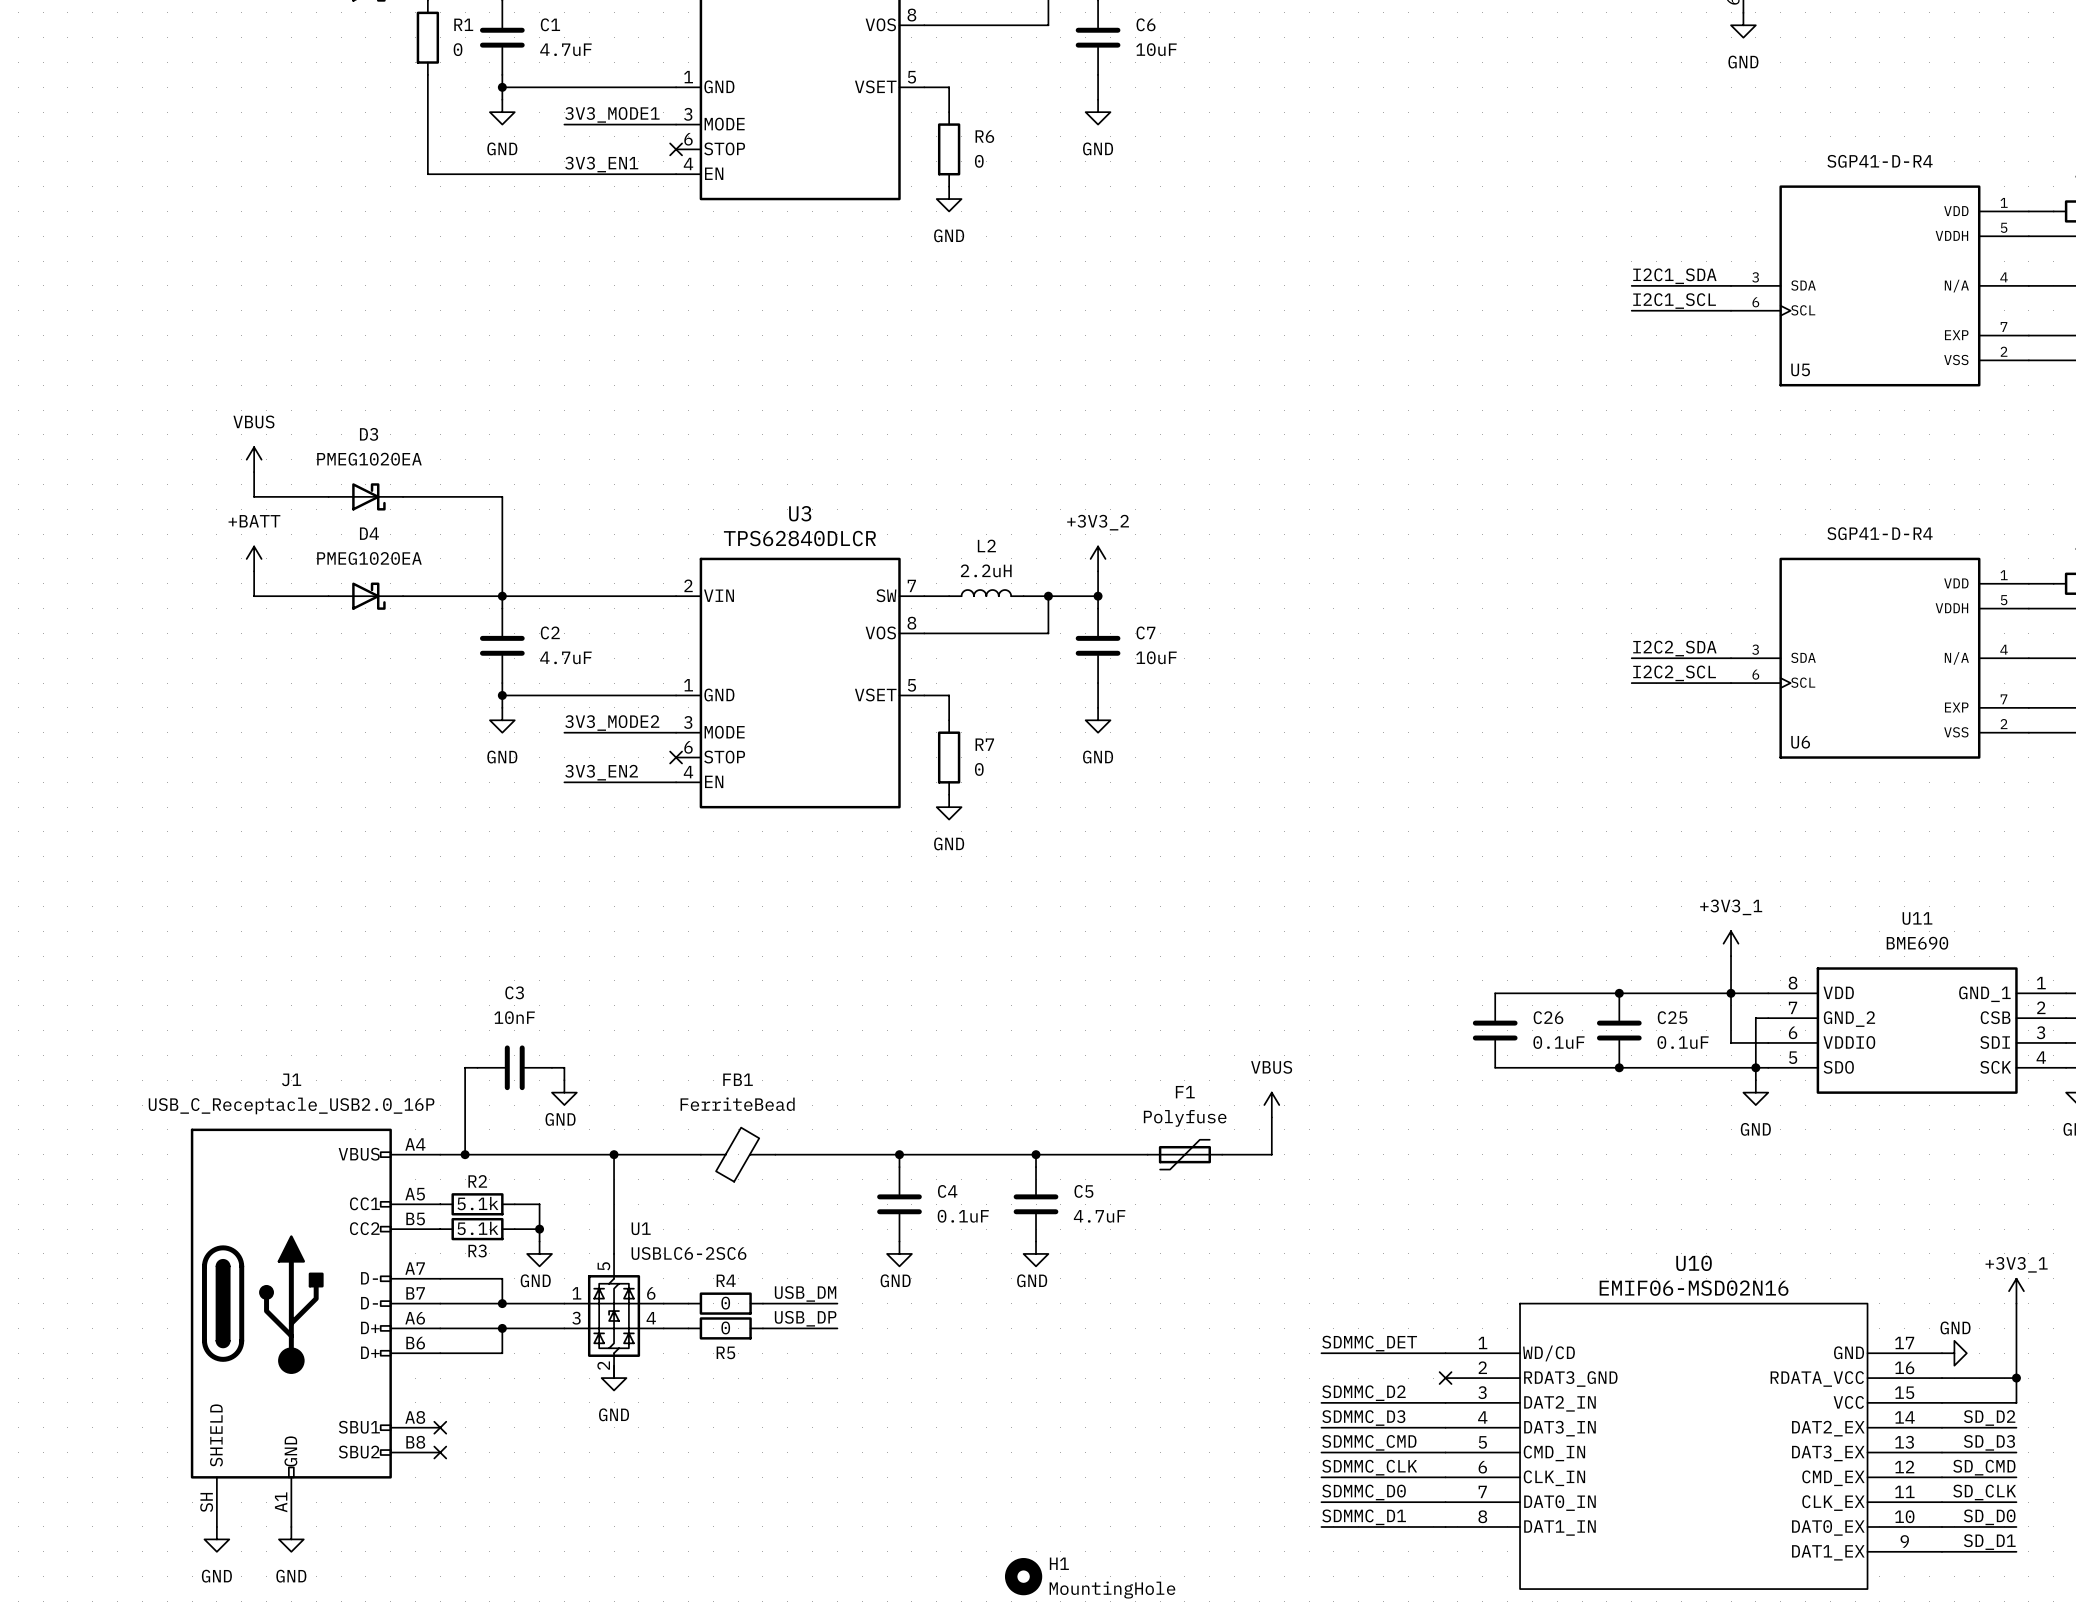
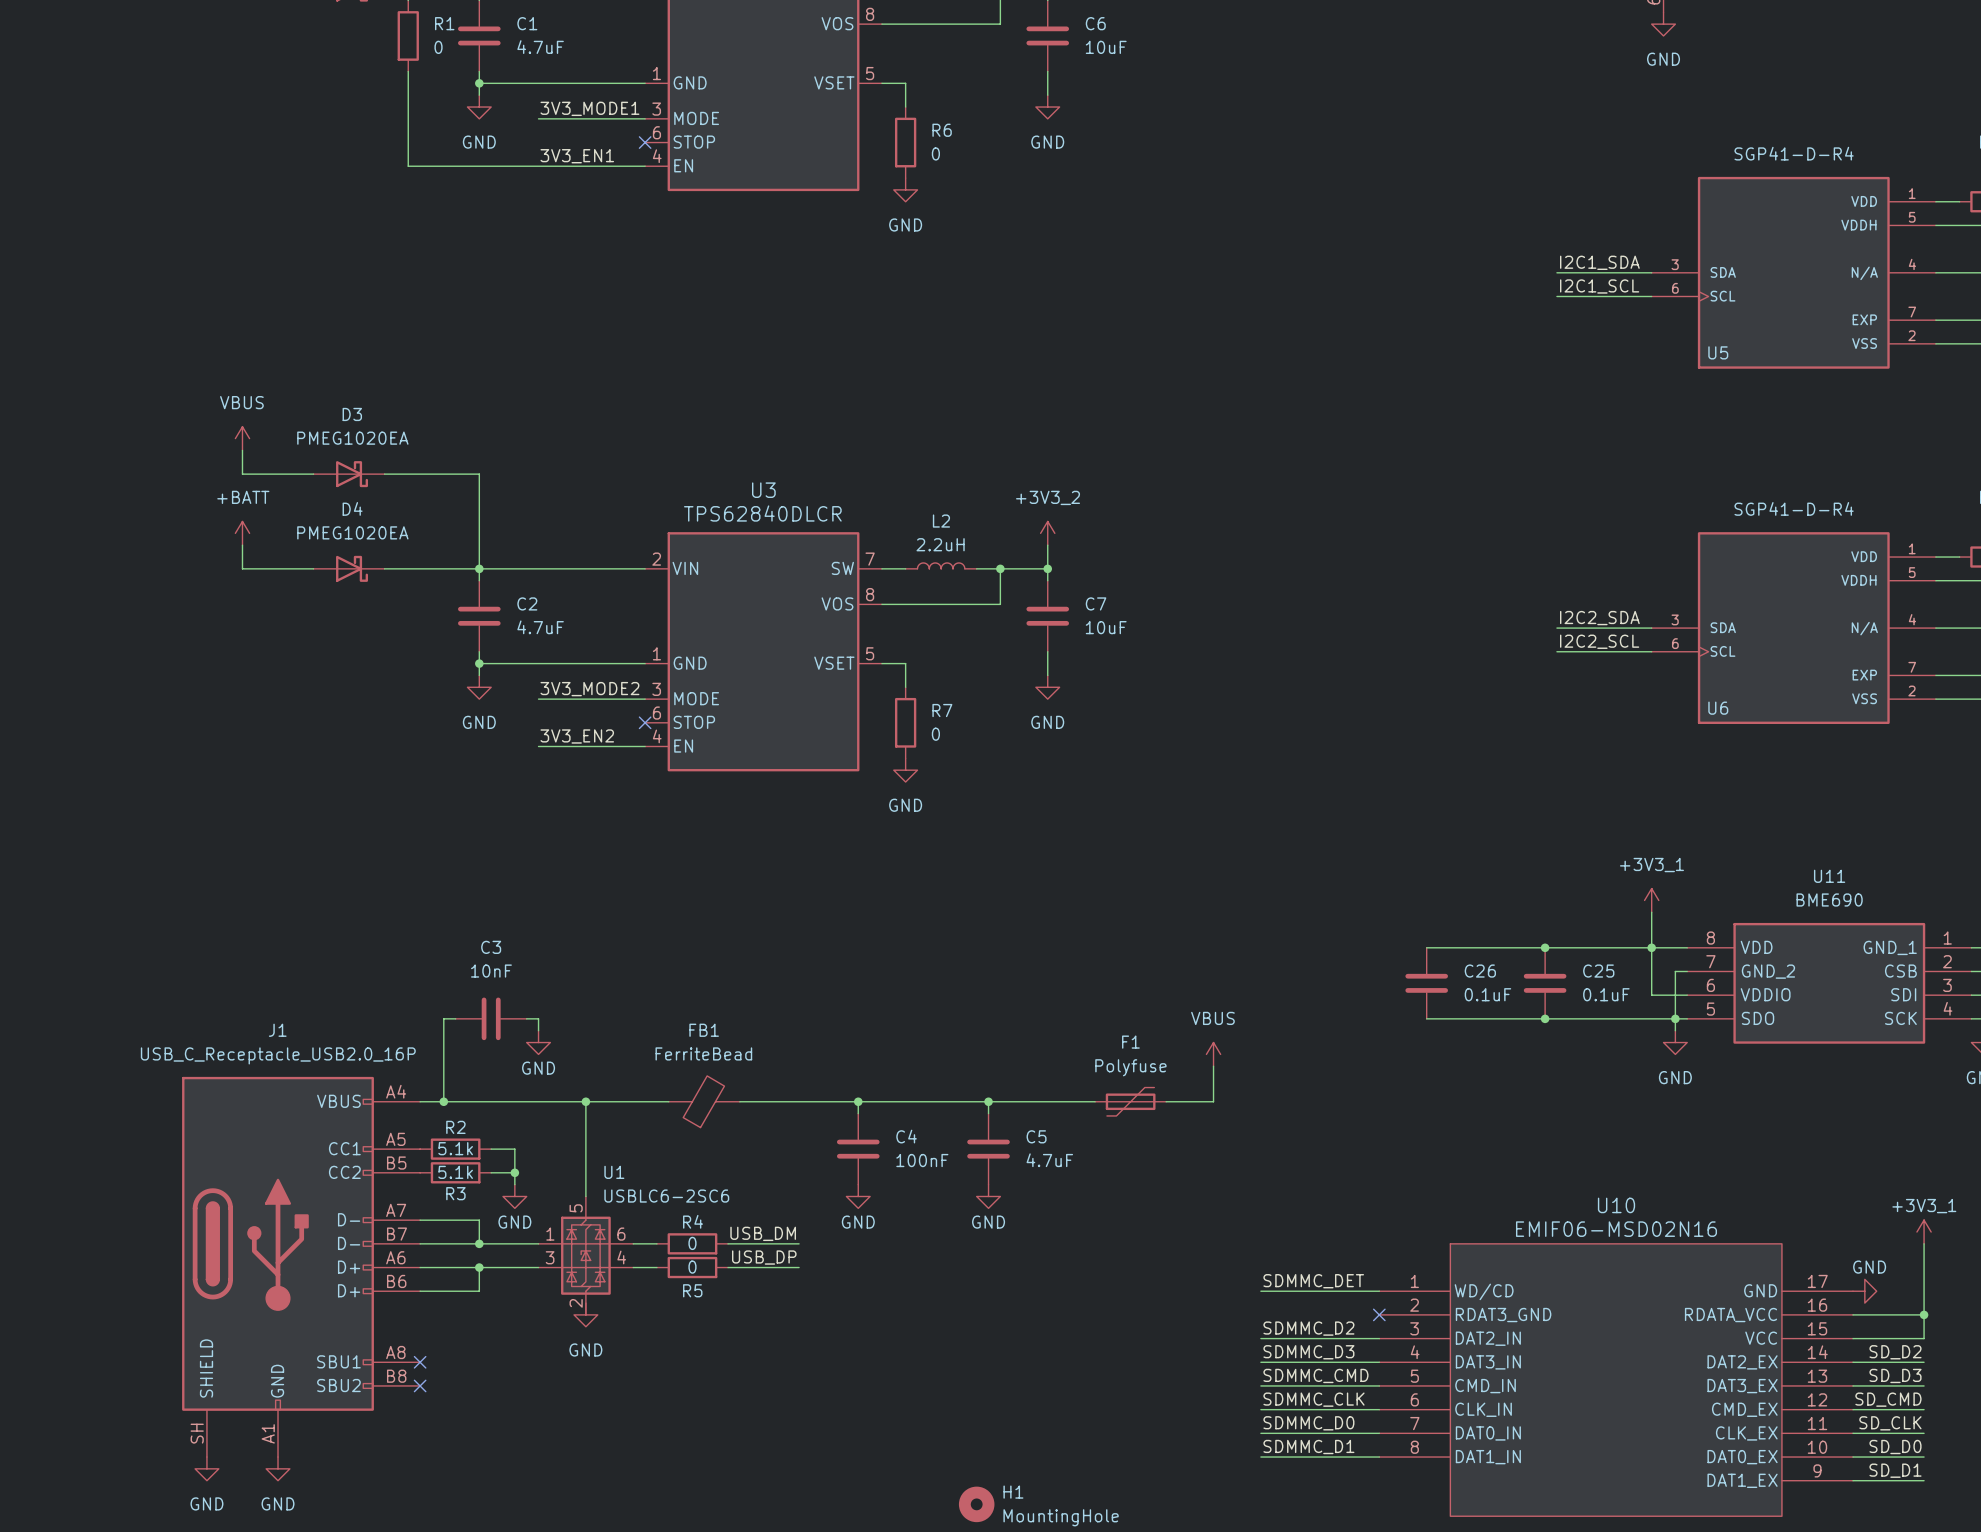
C4 value: 0.1uF (963, 1216) -> 100nF (922, 1160)

